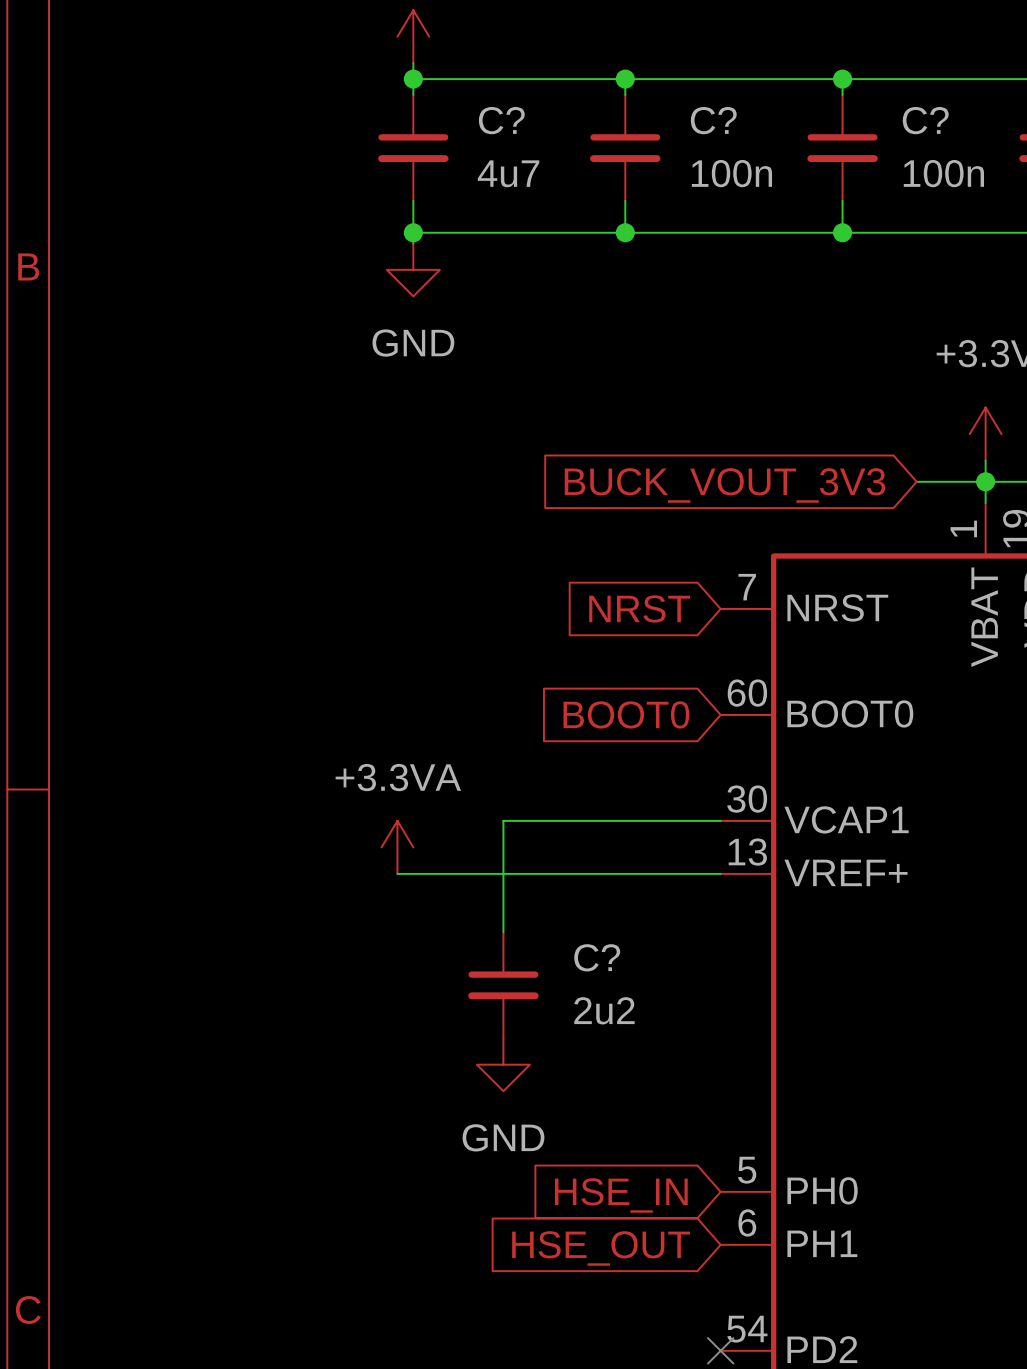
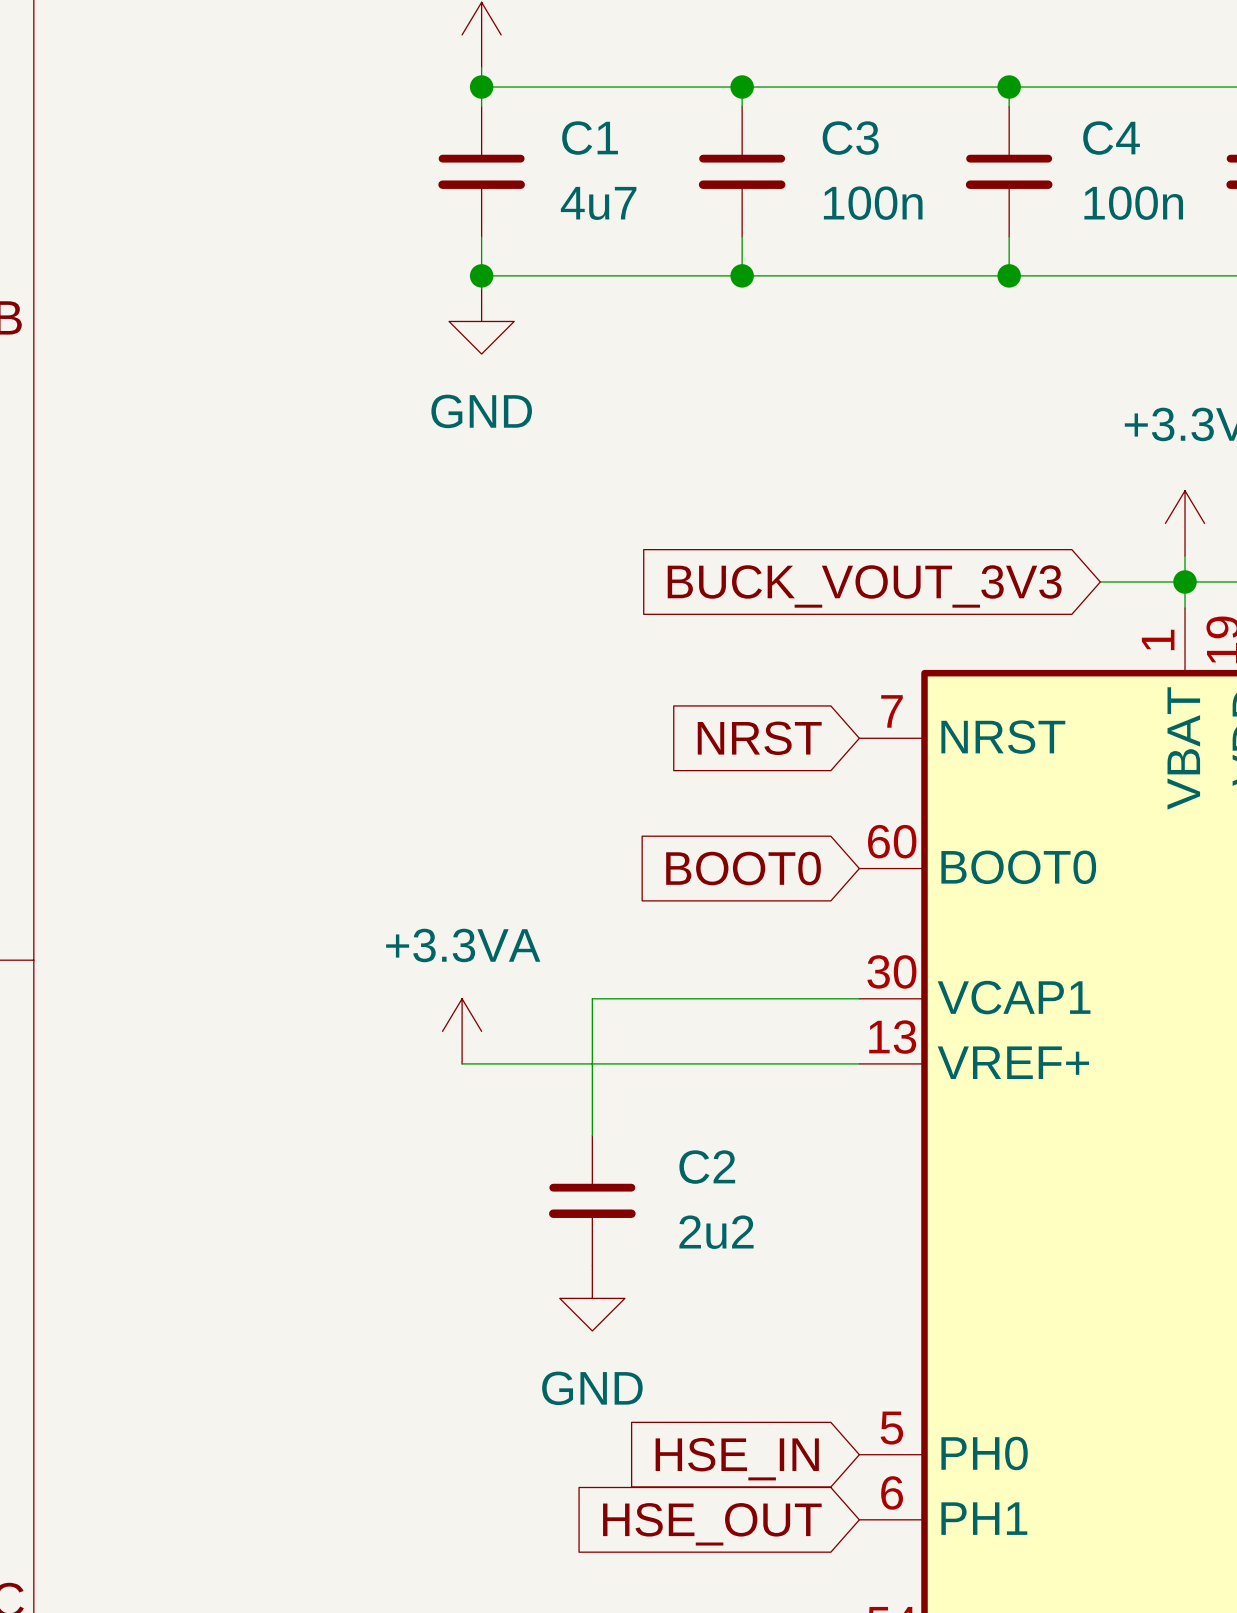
C? name: C? (501, 120) -> C1 (590, 138)
C? name: C? (713, 120) -> C3 (850, 138)
C? name: C? (925, 120) -> C4 (1111, 138)
C? name: C? (597, 957) -> C2 (707, 1167)

